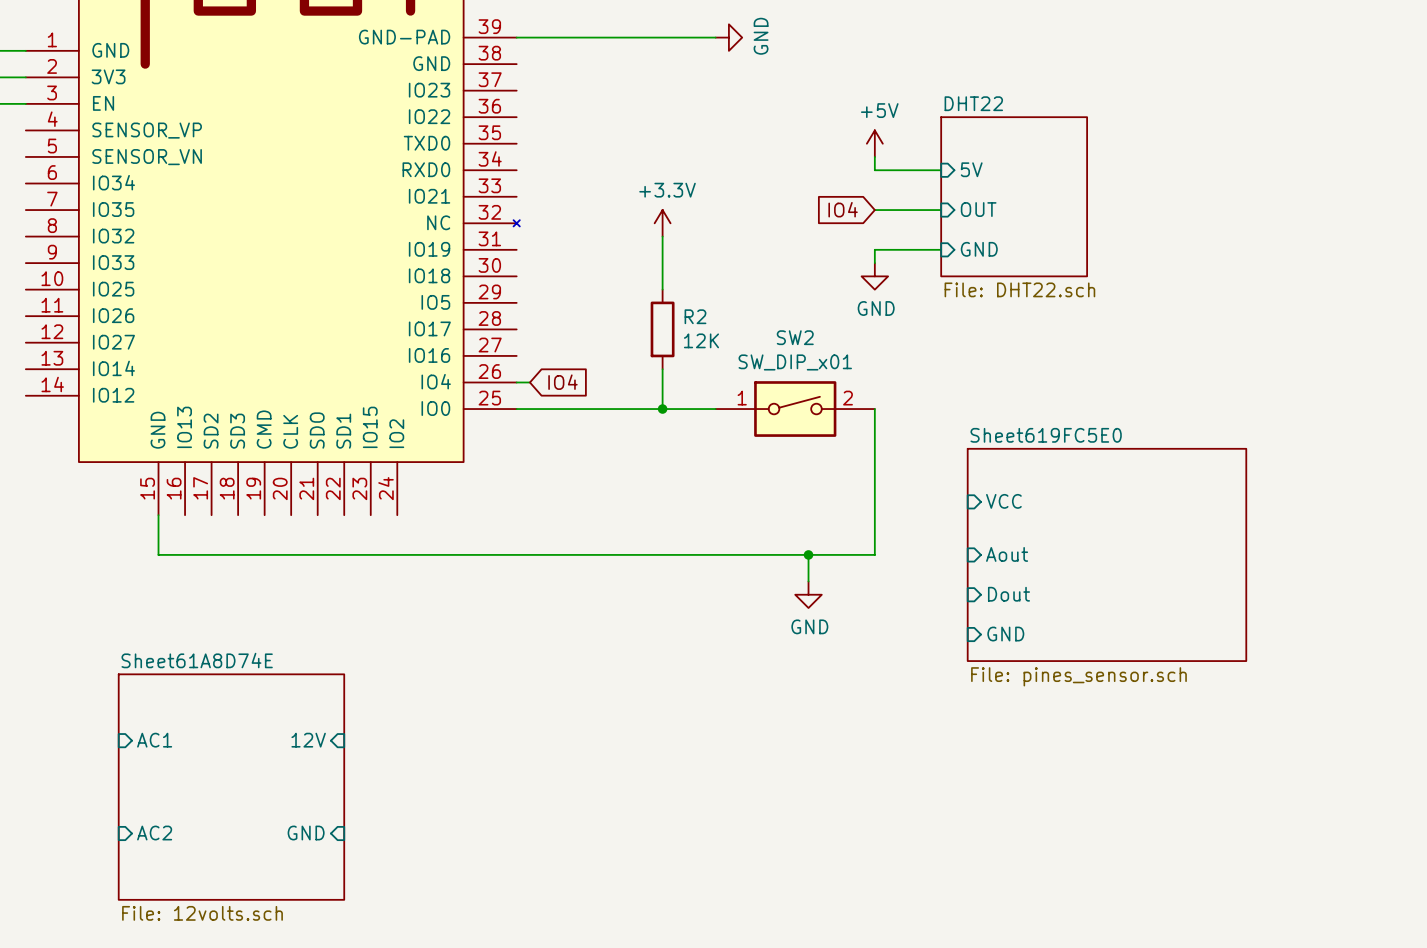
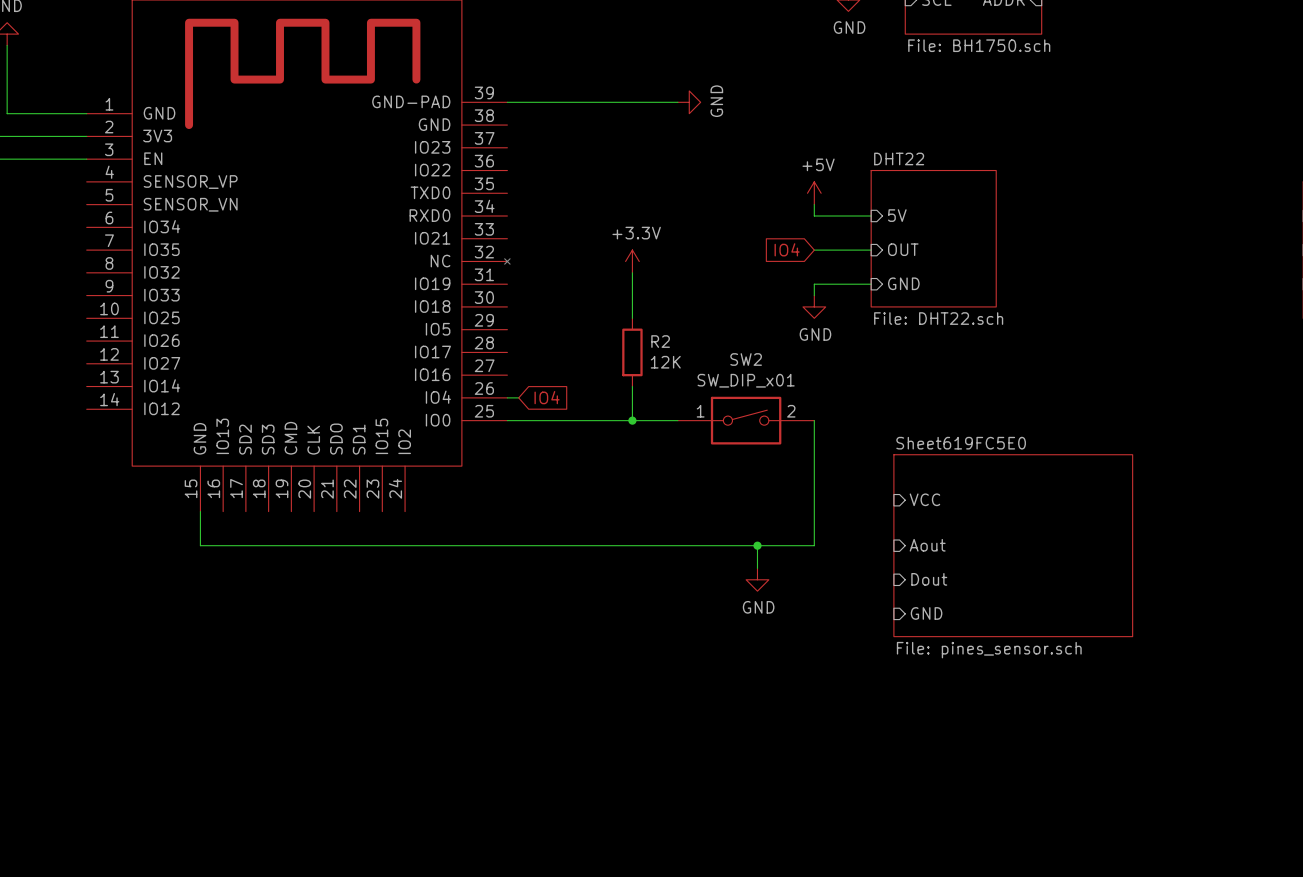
sheet pin: AC1 (154, 740) -> none
sheet pin: 12V (308, 740) -> none
sheet Sheet61A8D74E: File: 12volts.sch (231, 787) -> none
sheet pin: AC2 (154, 833) -> none
sheet pin: GND (306, 833) -> none

